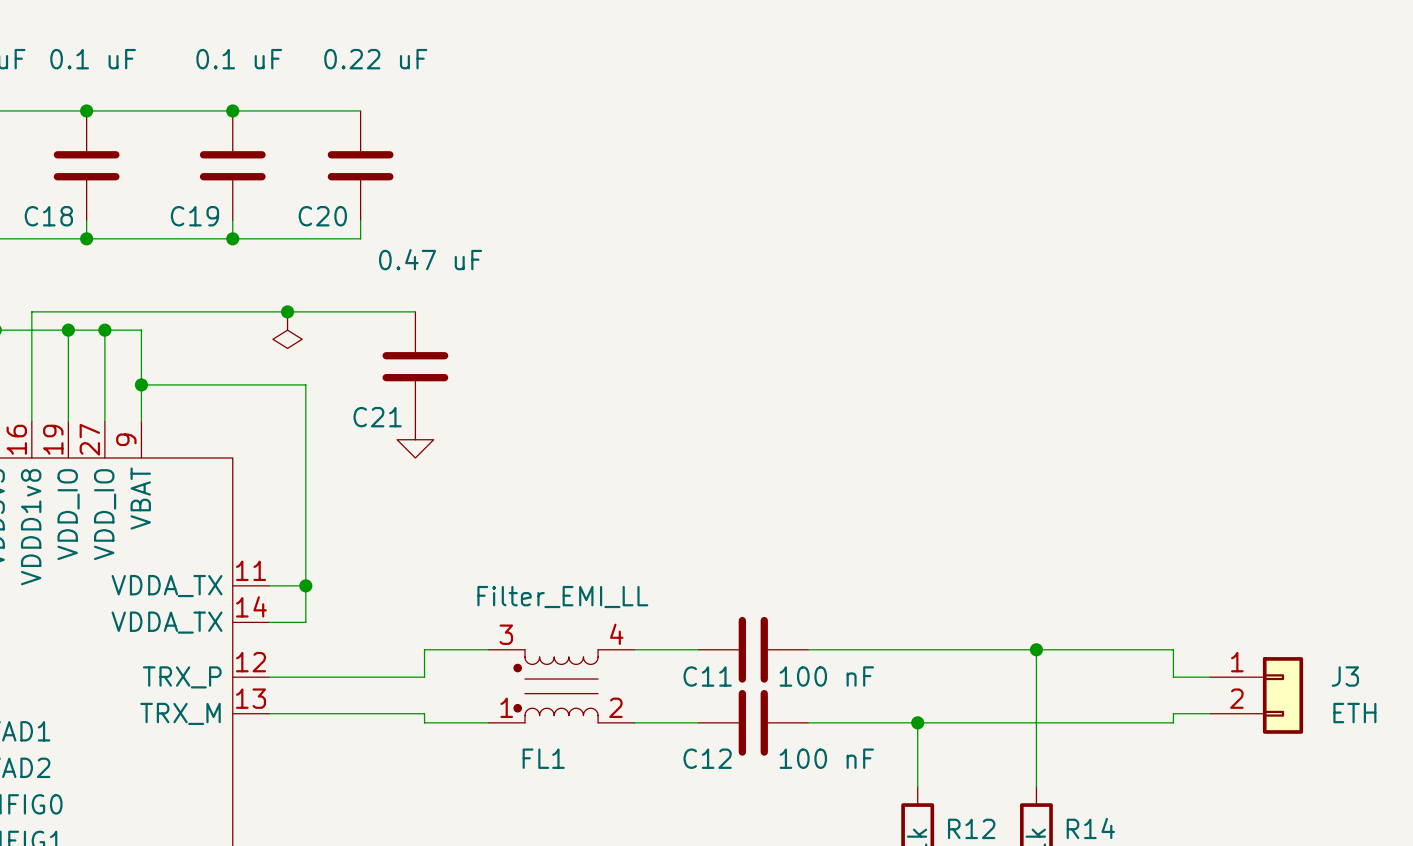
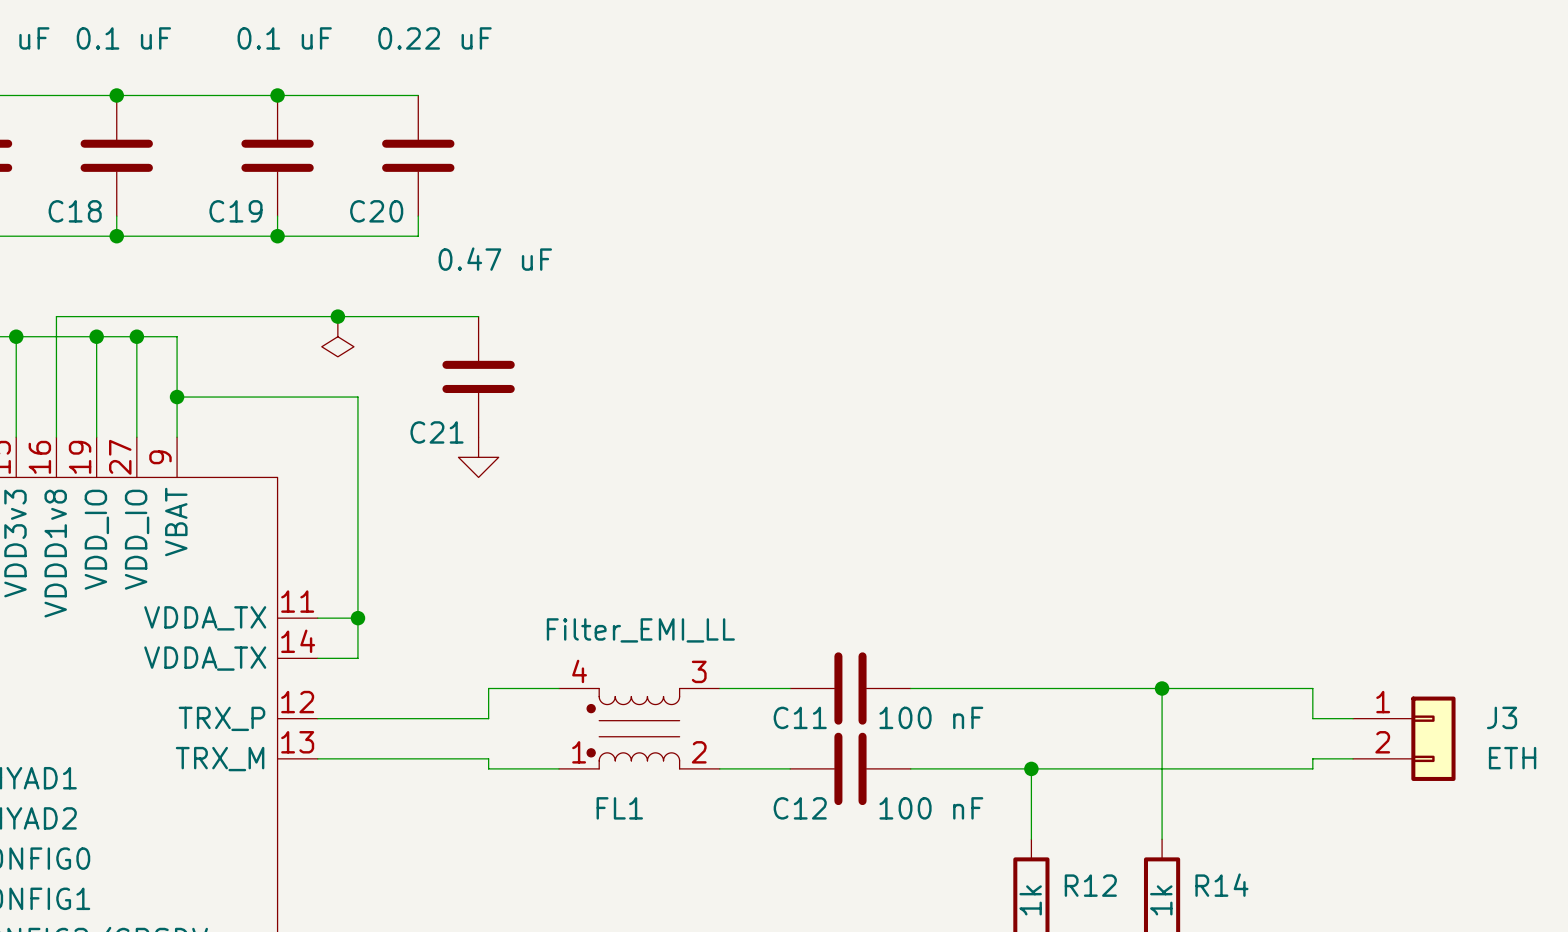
FL1 pin number: 3 (506, 634) -> 4 (579, 671)
FL1 pin number: 4 (616, 634) -> 3 (699, 671)

